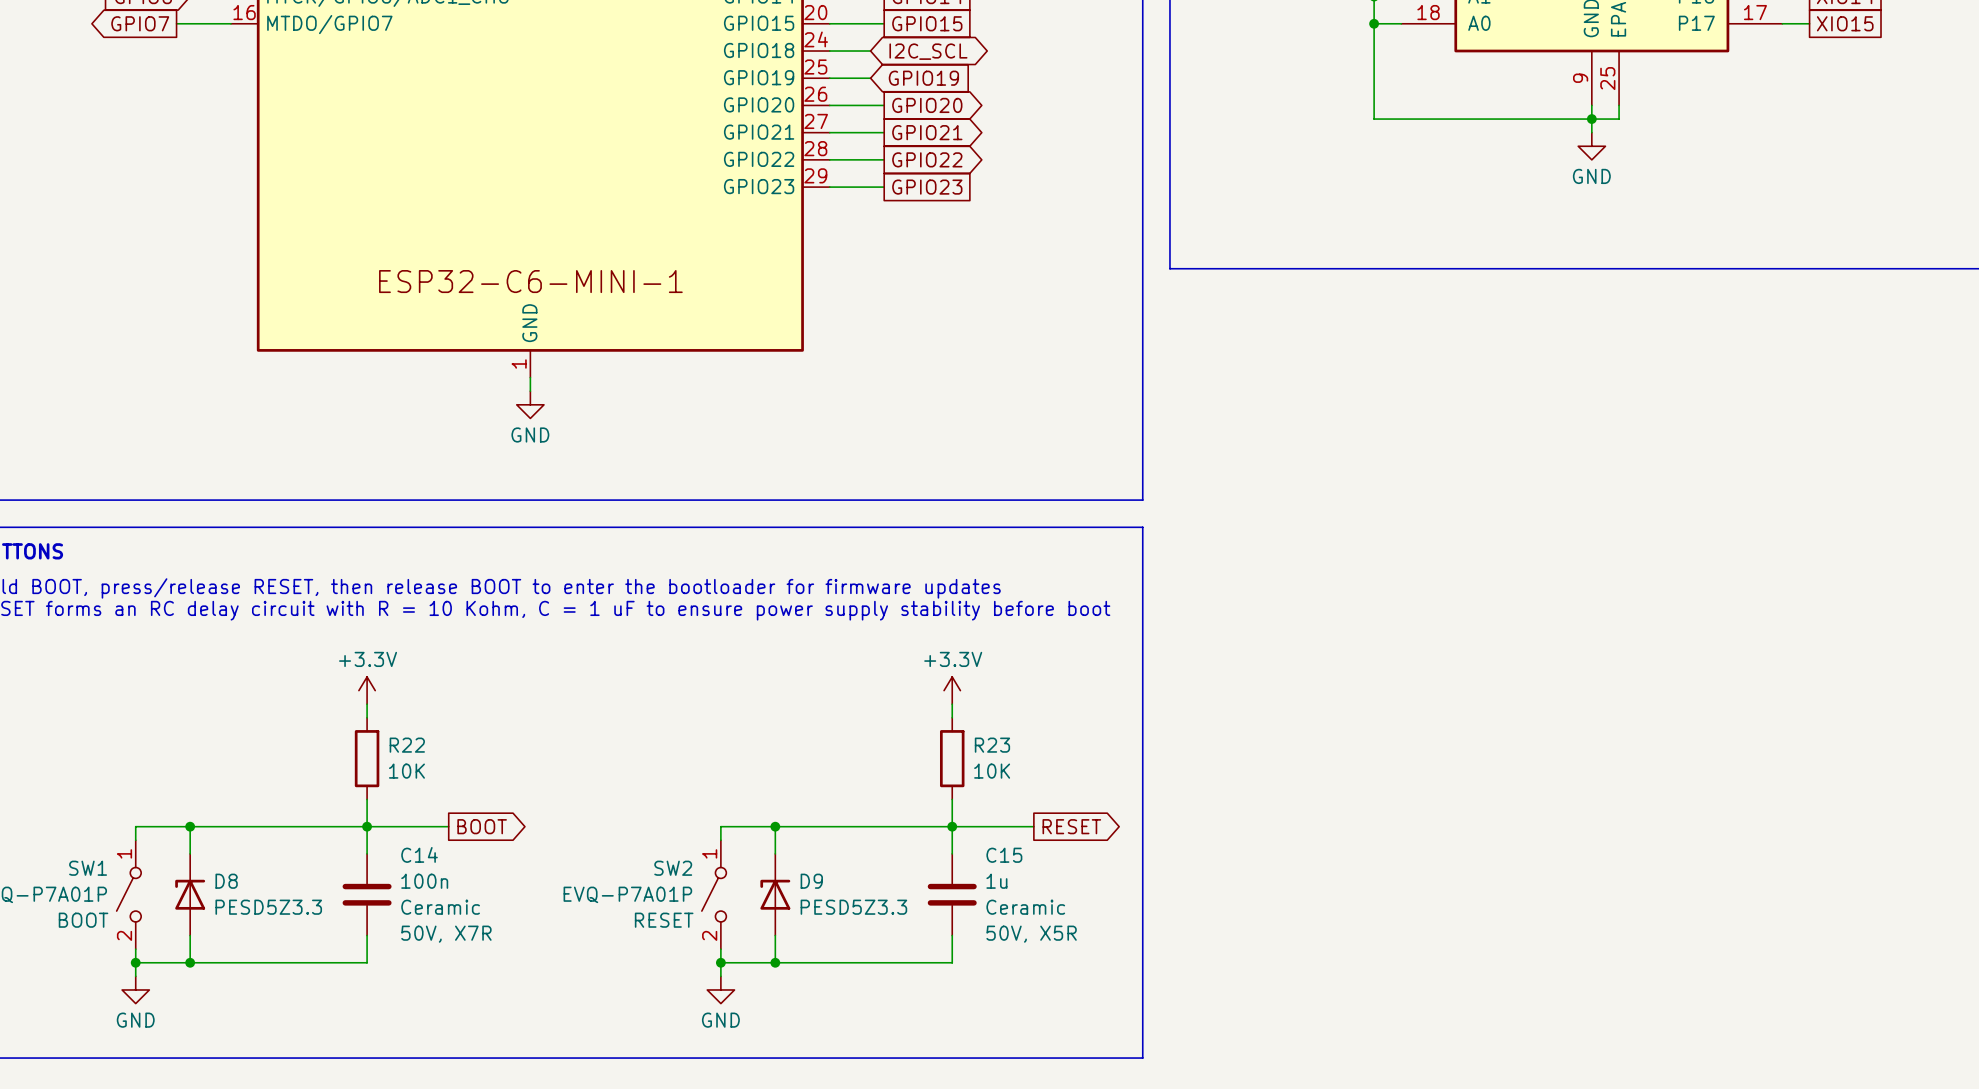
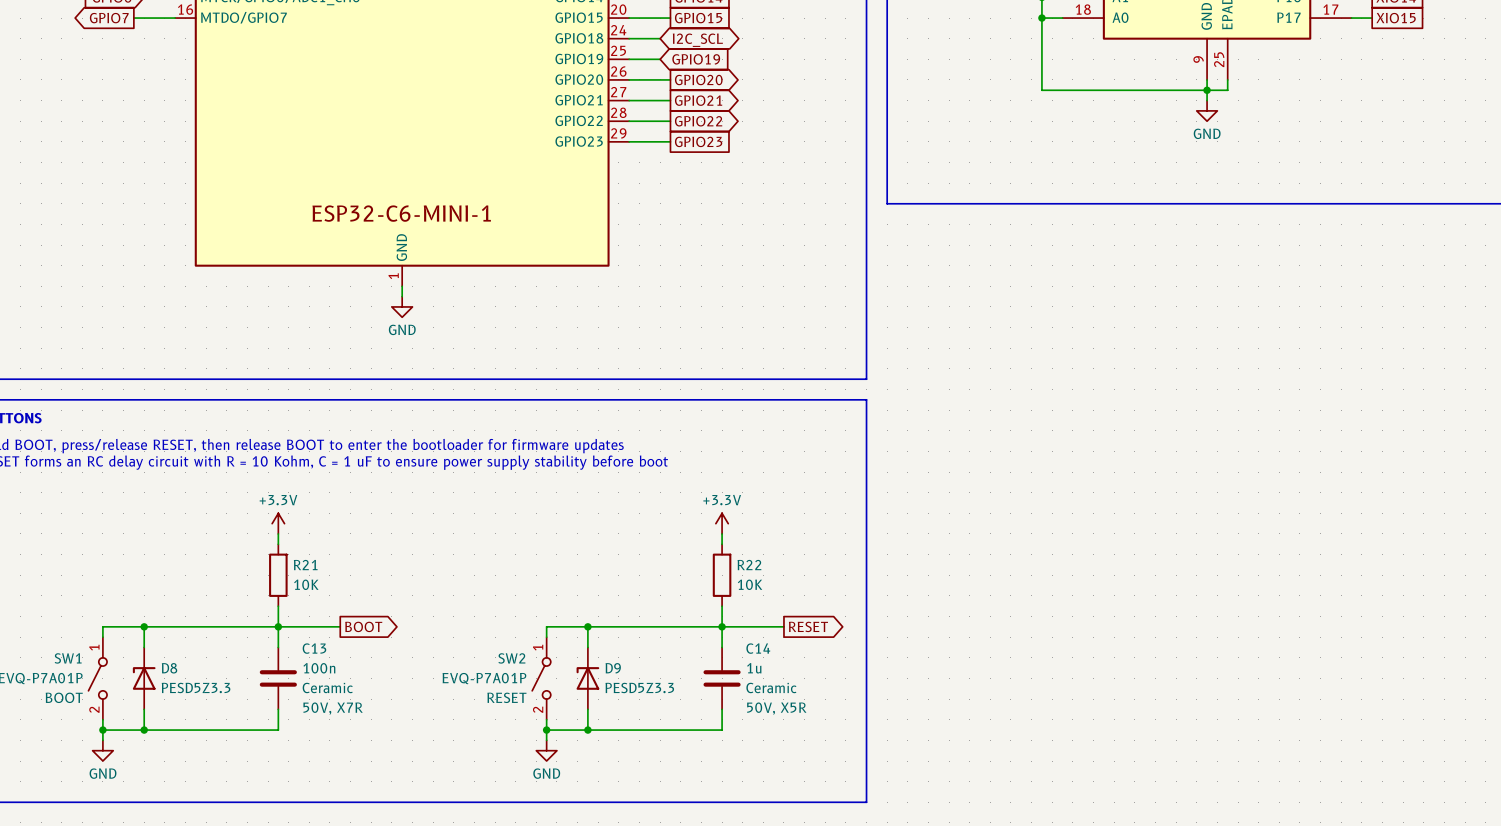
R22 name: R22 (407, 745) -> R21 (305, 565)
R23 name: R23 (992, 745) -> R22 (749, 565)
C14 name: C14 (419, 854) -> C13 (314, 648)
C15 name: C15 (1004, 855) -> C14 (758, 648)

